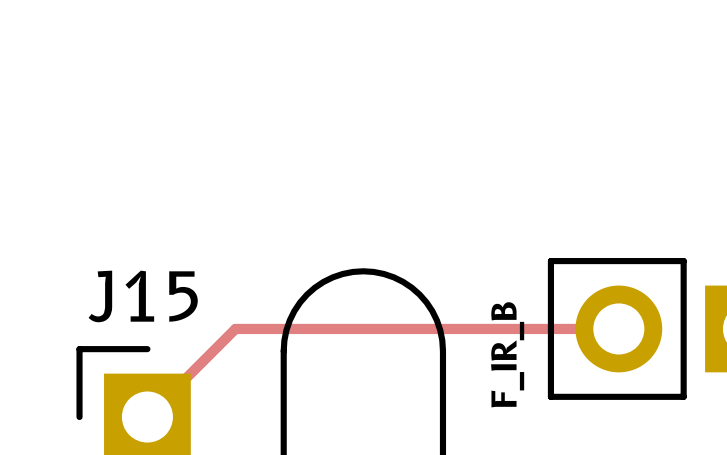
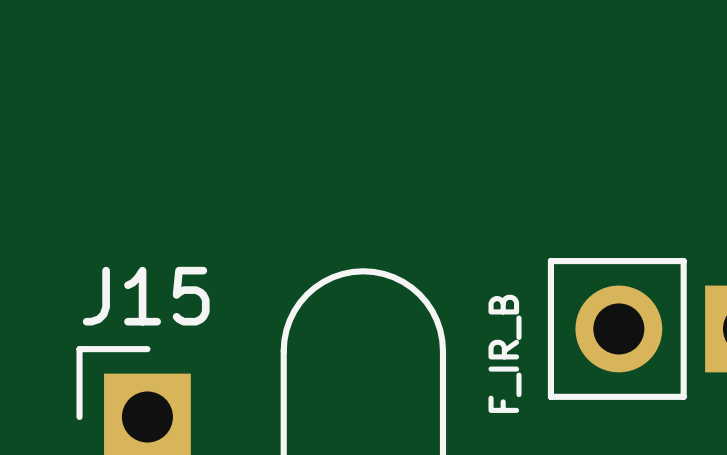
track: (618, 328) (235, 328) (147, 417) -> none

